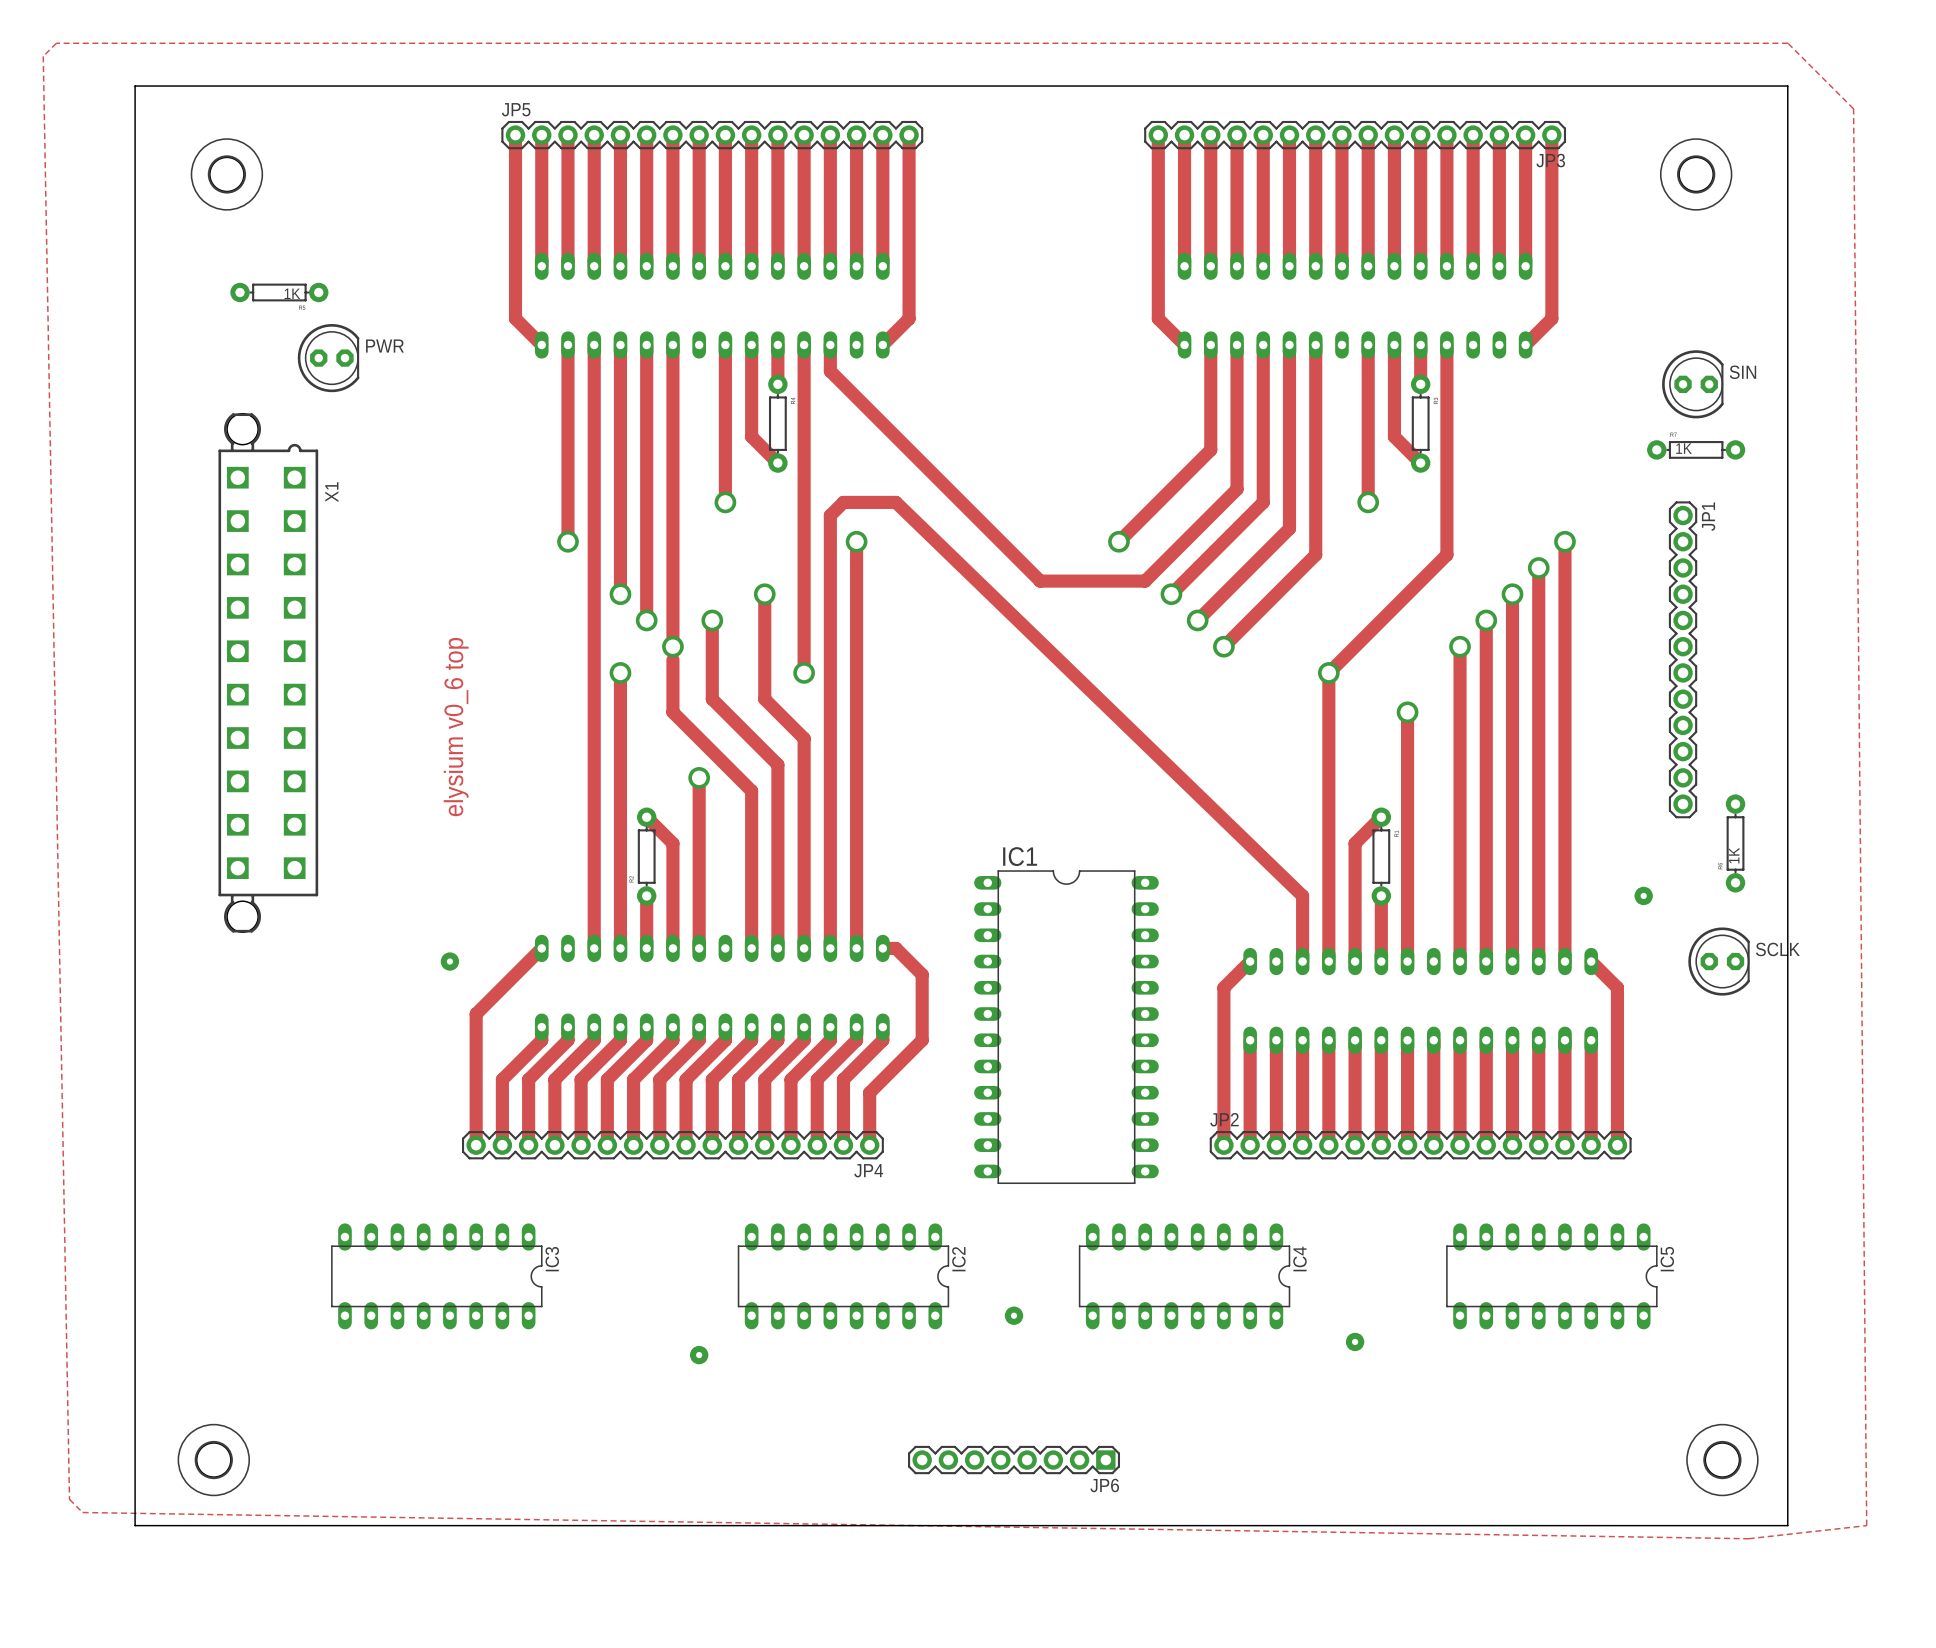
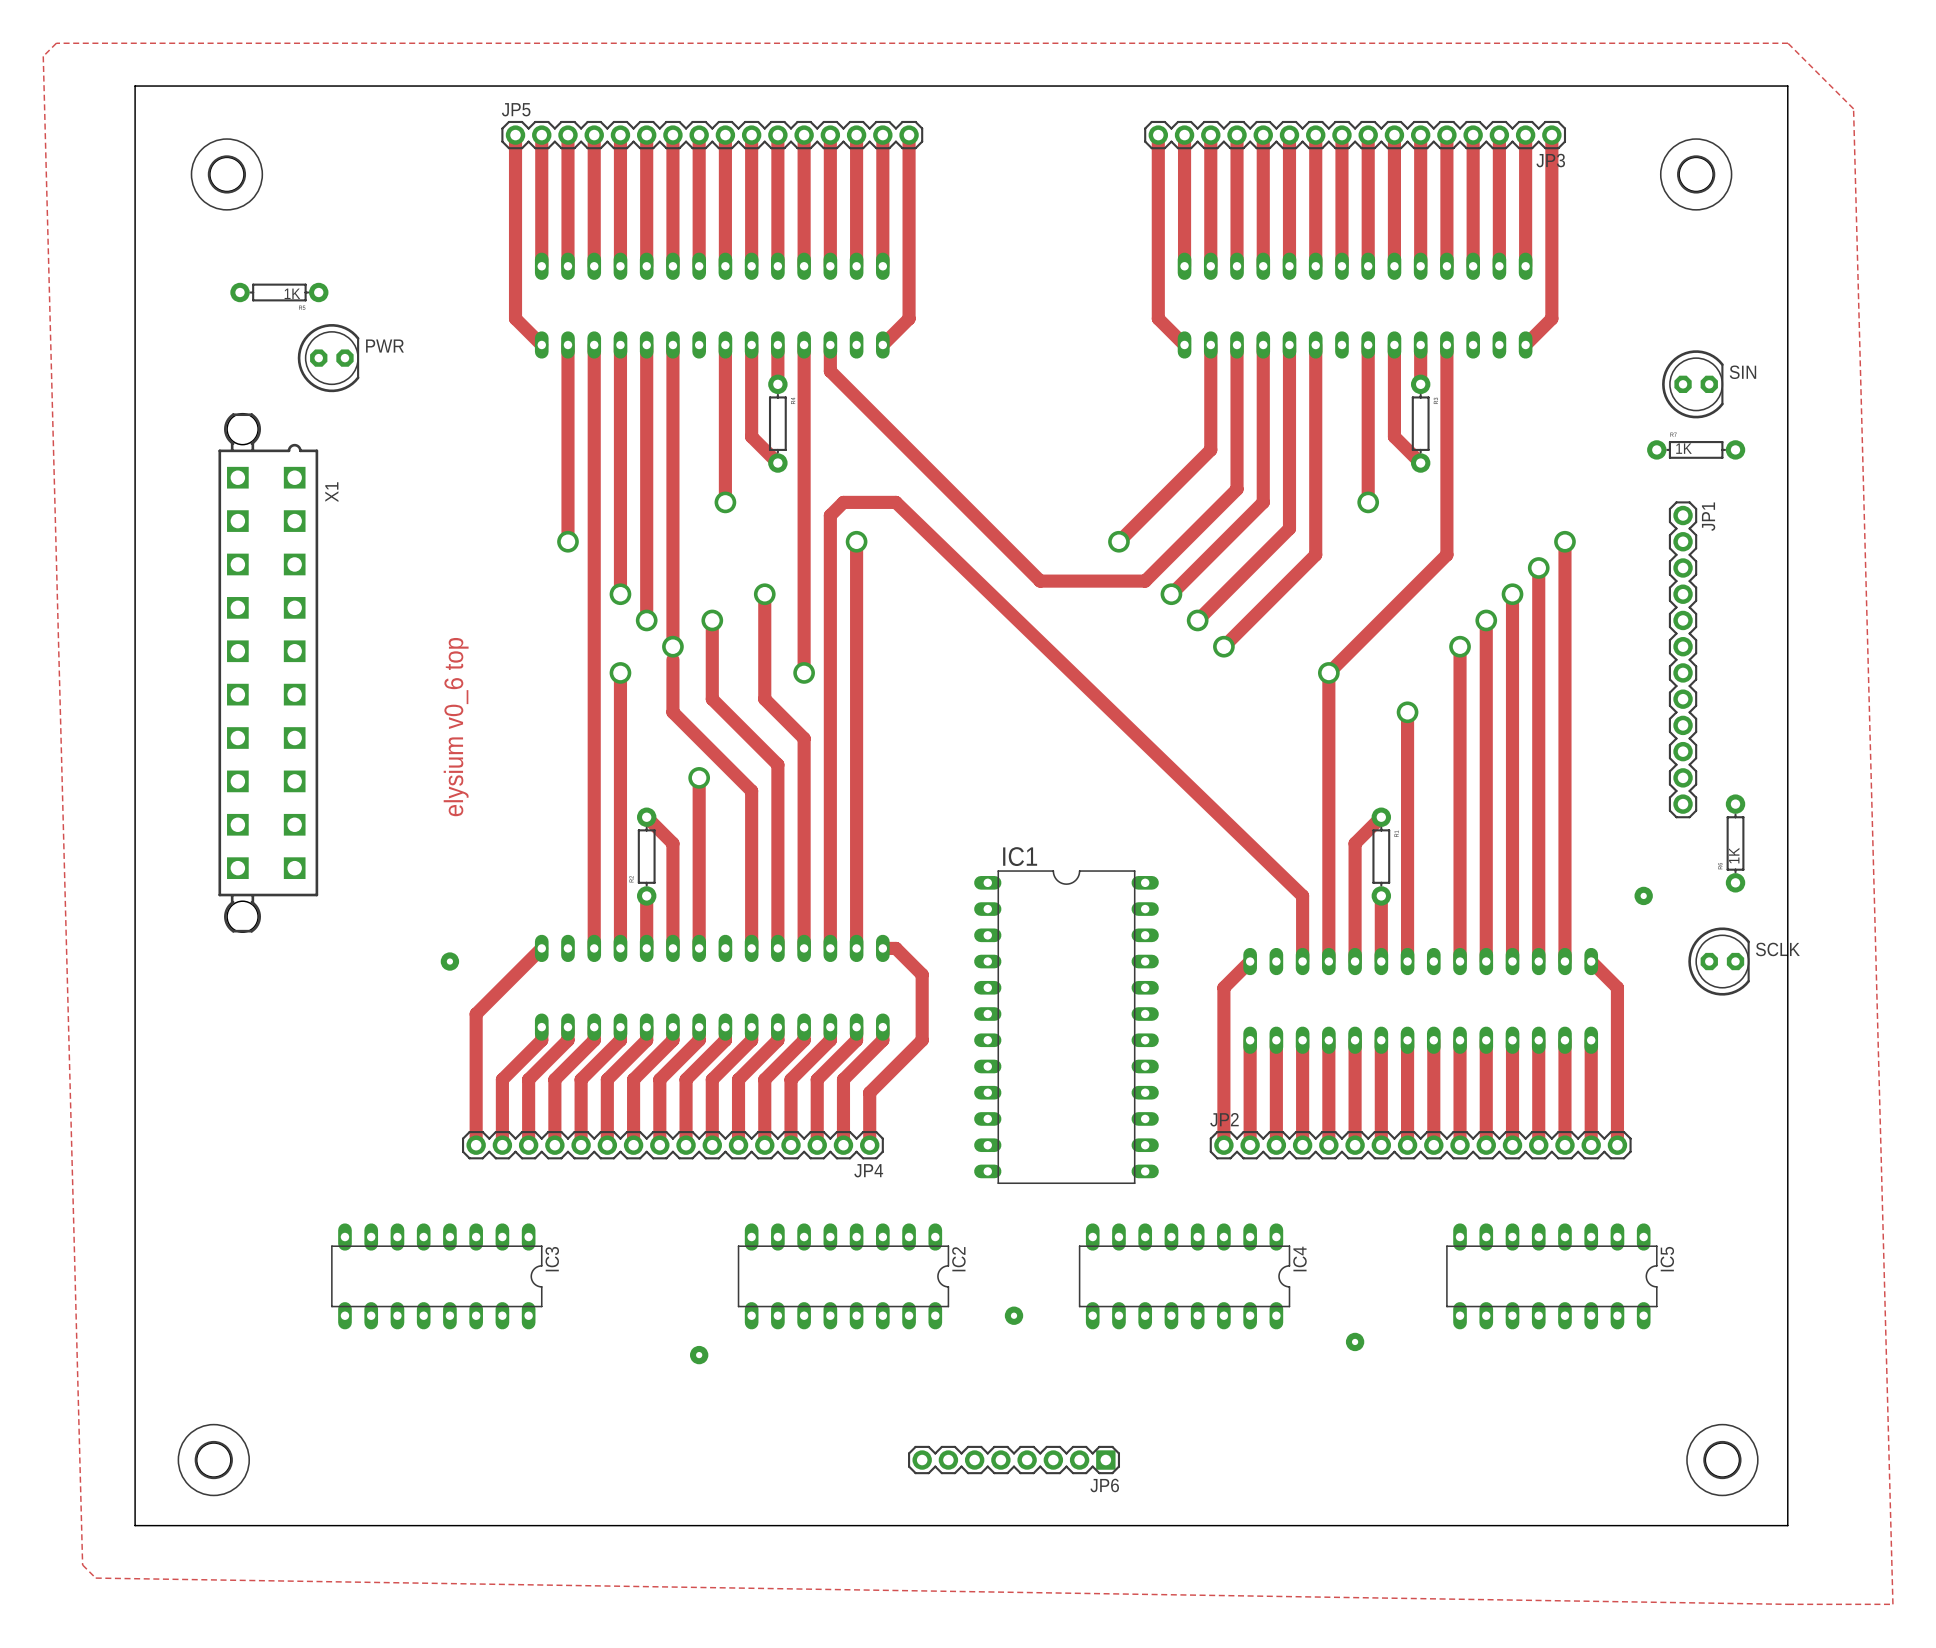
zone outline: (43, 56) (69, 1499) (82, 1512) (1748, 1538) (1866, 1525) (1853, 108) -> (43, 56) (82, 1564) (95, 1578) (1787, 1604) (1892, 1604) (1853, 108)

